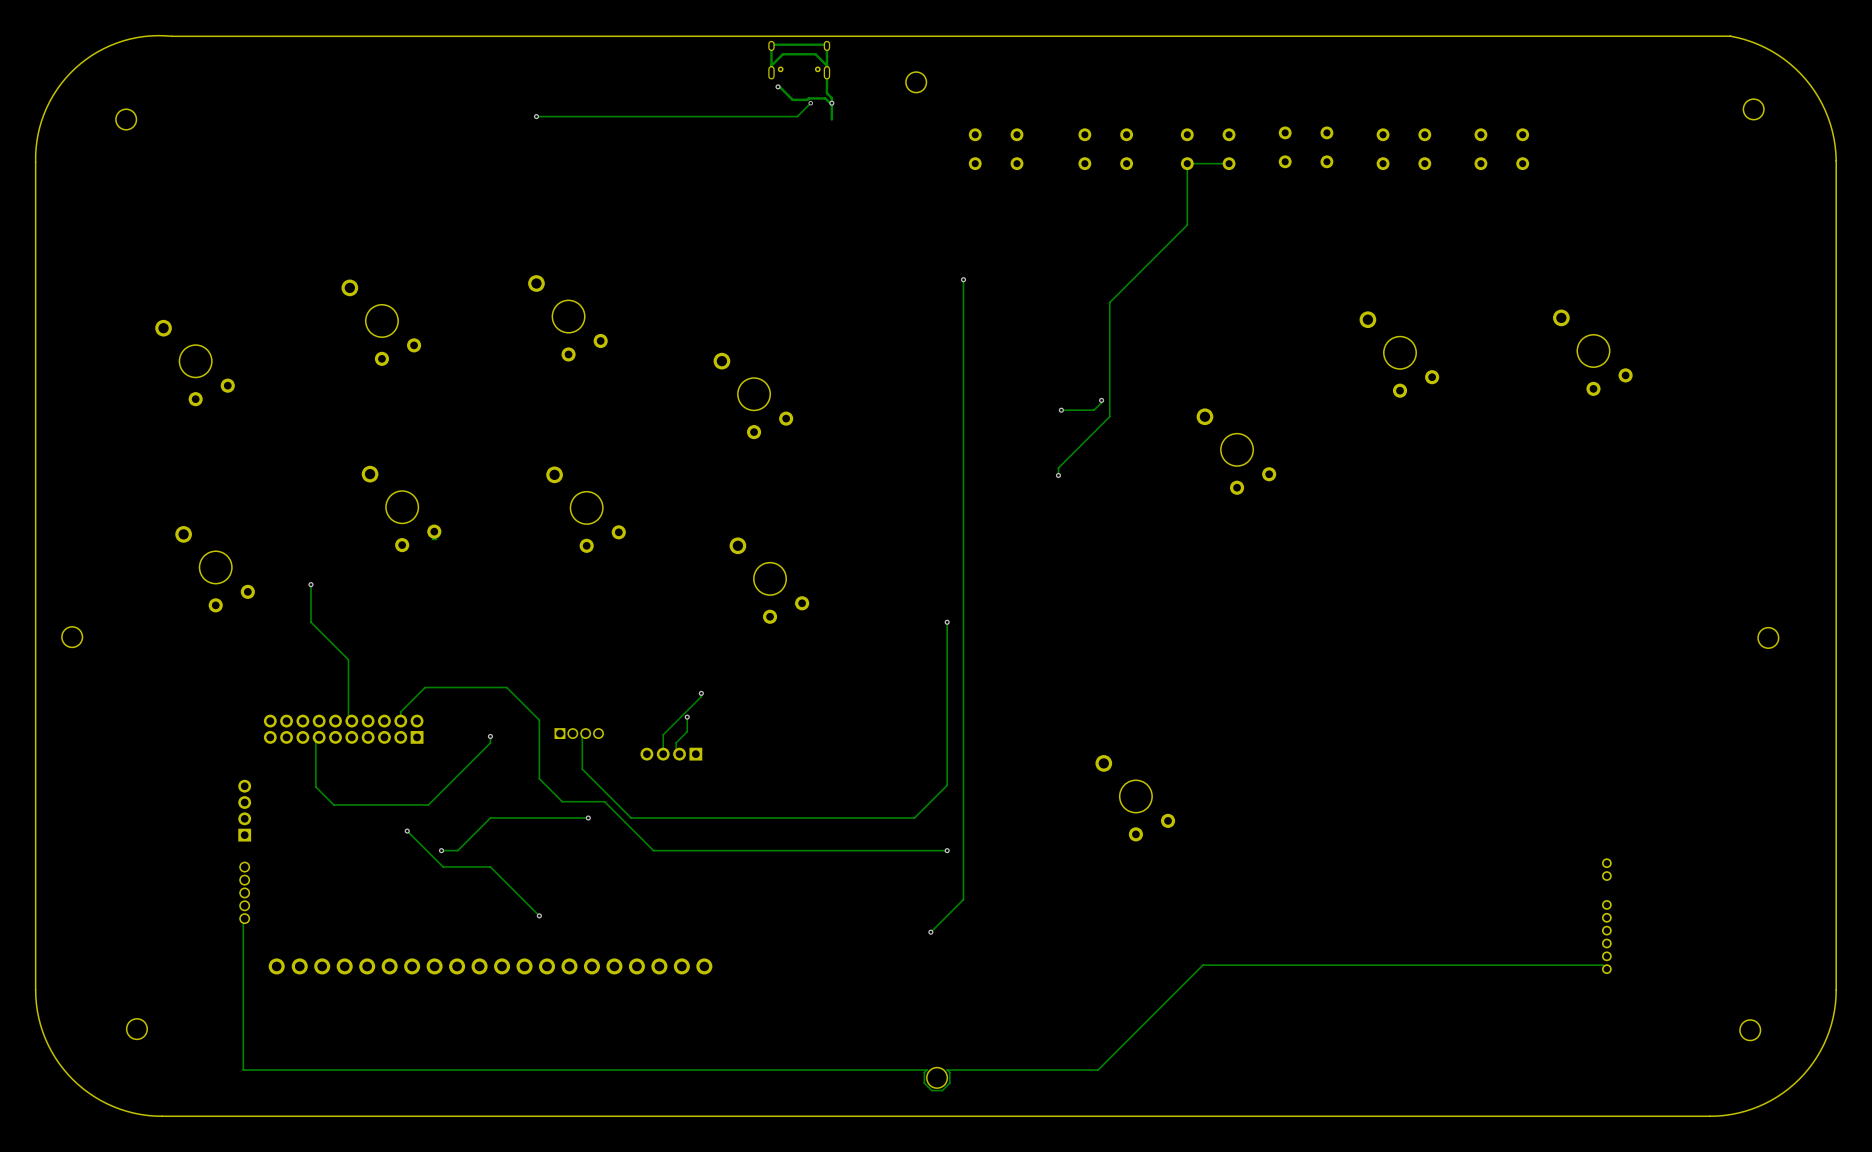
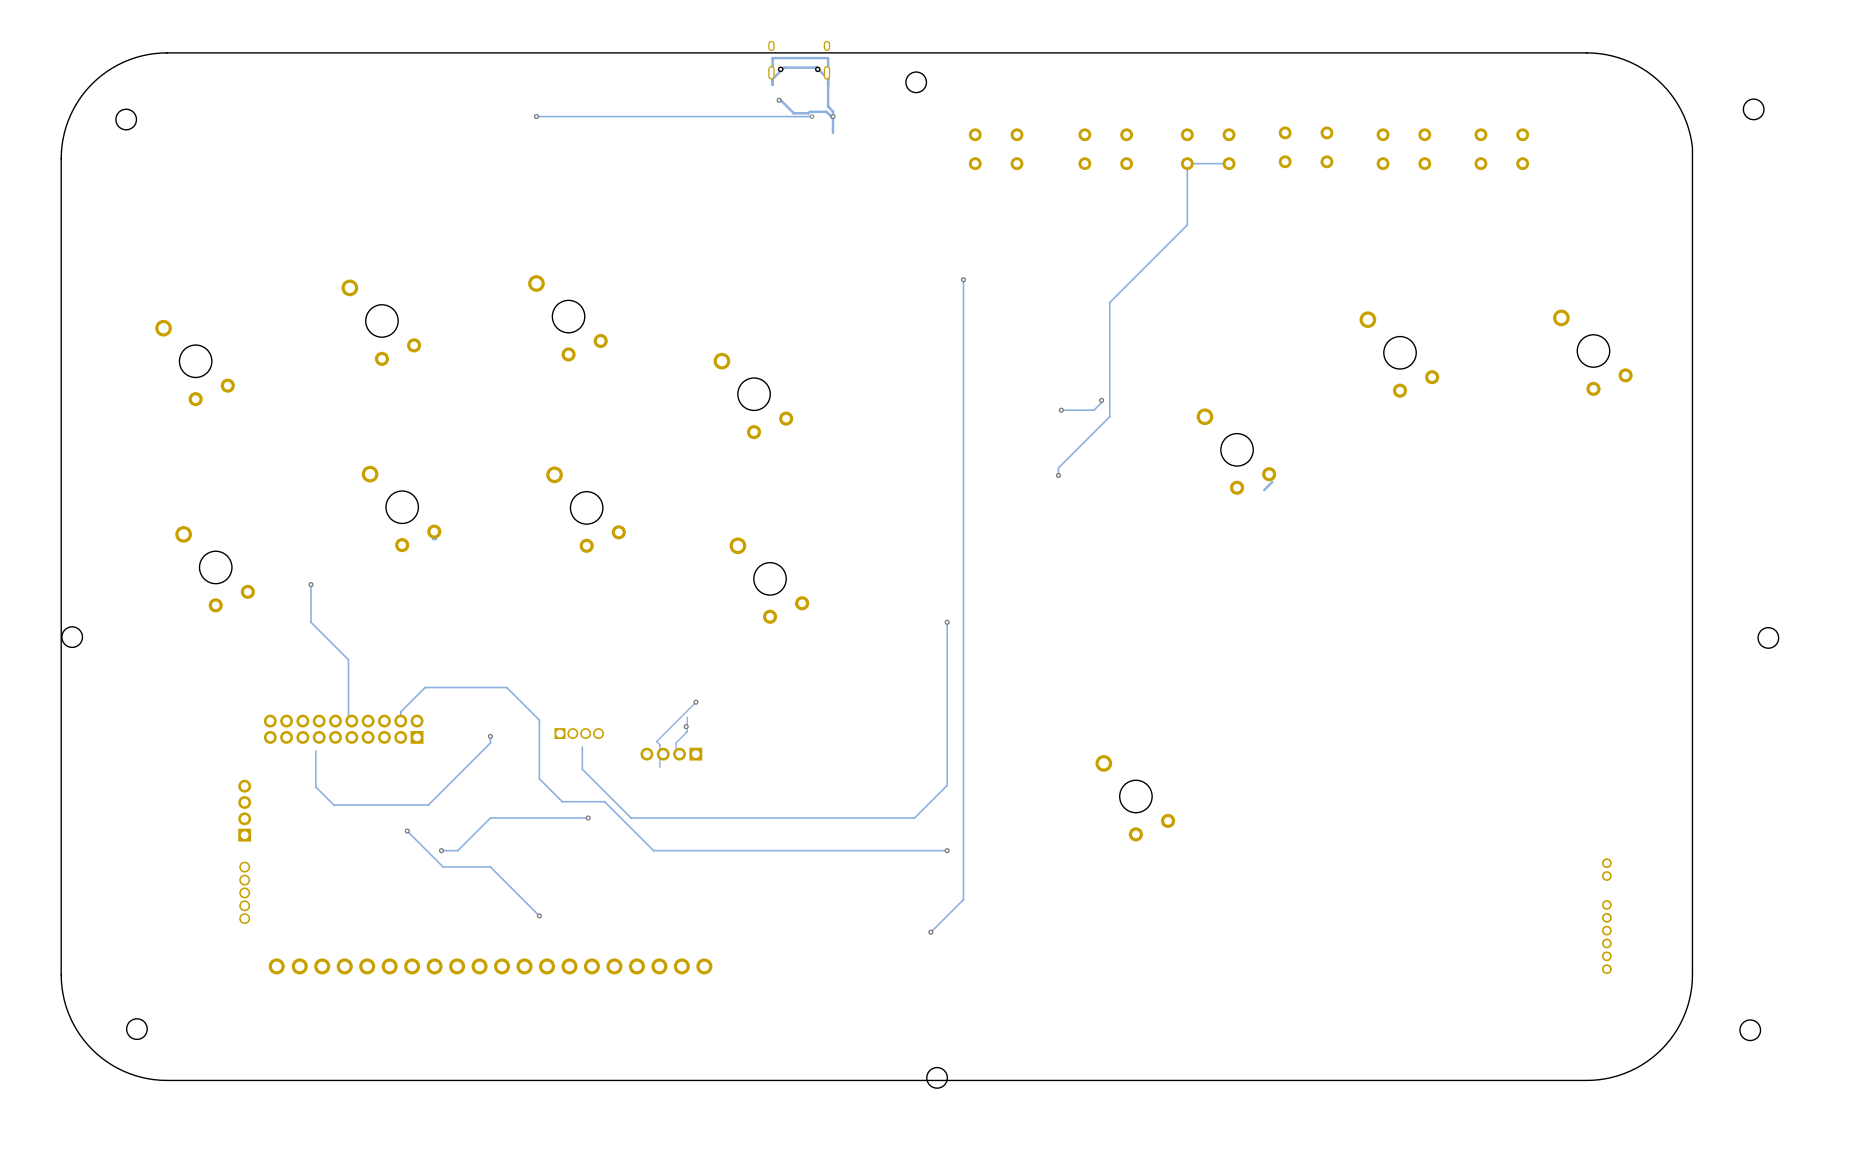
board edge: (1730, 36) (157, 35) (123, 40) (91, 55) (70, 73) (49, 101) (39, 127) (35, 155) (35, 990) (40, 1025) (54, 1057) (77, 1084) (100, 1100) (133, 1113) (161, 1116) (1710, 1116) (1744, 1111) (1777, 1096) (1799, 1079) (1816, 1057) (1829, 1031) (1836, 997) (1835, 153) (1832, 131) (1825, 110) (1814, 91) (1800, 73) (1771, 51) (1751, 41) (1730, 36) -> (1586, 52) (1606, 54) (1624, 59) (1642, 68) (1657, 80) (1670, 94) (1681, 110) (1688, 128) (1692, 147) (1692, 981) (1687, 1006) (1680, 1023) (1665, 1044) (1646, 1061) (1618, 1075) (1586, 1080) (166, 1080) (141, 1077) (117, 1068) (96, 1053) (79, 1034) (66, 1006) (61, 974) (61, 158) (64, 133) (73, 109) (87, 88) (106, 71) (135, 57) (166, 52) (1586, 52)
track: (826, 65) (815, 54) (782, 54) (771, 65) -> (828, 79) (816, 67) (784, 67) (772, 79)
track: (771, 71) (771, 44) (826, 44) (826, 93) (831, 98) (831, 119) -> (772, 84) (772, 58) (828, 58) (828, 106) (832, 111) (832, 132)
track: (778, 86) (792, 99) (825, 98) (831, 104) -> (779, 100) (793, 113) (826, 111) (832, 118)
via position: (778, 86) -> (779, 100)
track: (810, 103) (797, 116) -> (811, 116) (797, 116)
via position: (810, 103) -> (811, 116)
via position: (831, 103) -> (832, 116)
track: none -> (1272, 481) (1264, 490)
track: (701, 693) (701, 696) (663, 734) (663, 754) -> none
via: (701, 693) -> none
track: none -> (695, 702) (656, 741) (659, 744) (659, 767)
via: none -> (695, 702)
via: (687, 717) -> none
via: none -> (686, 726)
track: (585, 733) (582, 736) (582, 747) -> none
track: (319, 737) (315, 740) (315, 750) -> none
track: (244, 918) (243, 1070) (926, 1070) (924, 1072) (924, 1083) (931, 1090) (942, 1090) (949, 1083) (949, 1072) (947, 1070) (1098, 1070) (1202, 965) (1602, 965) (1606, 969) -> none

